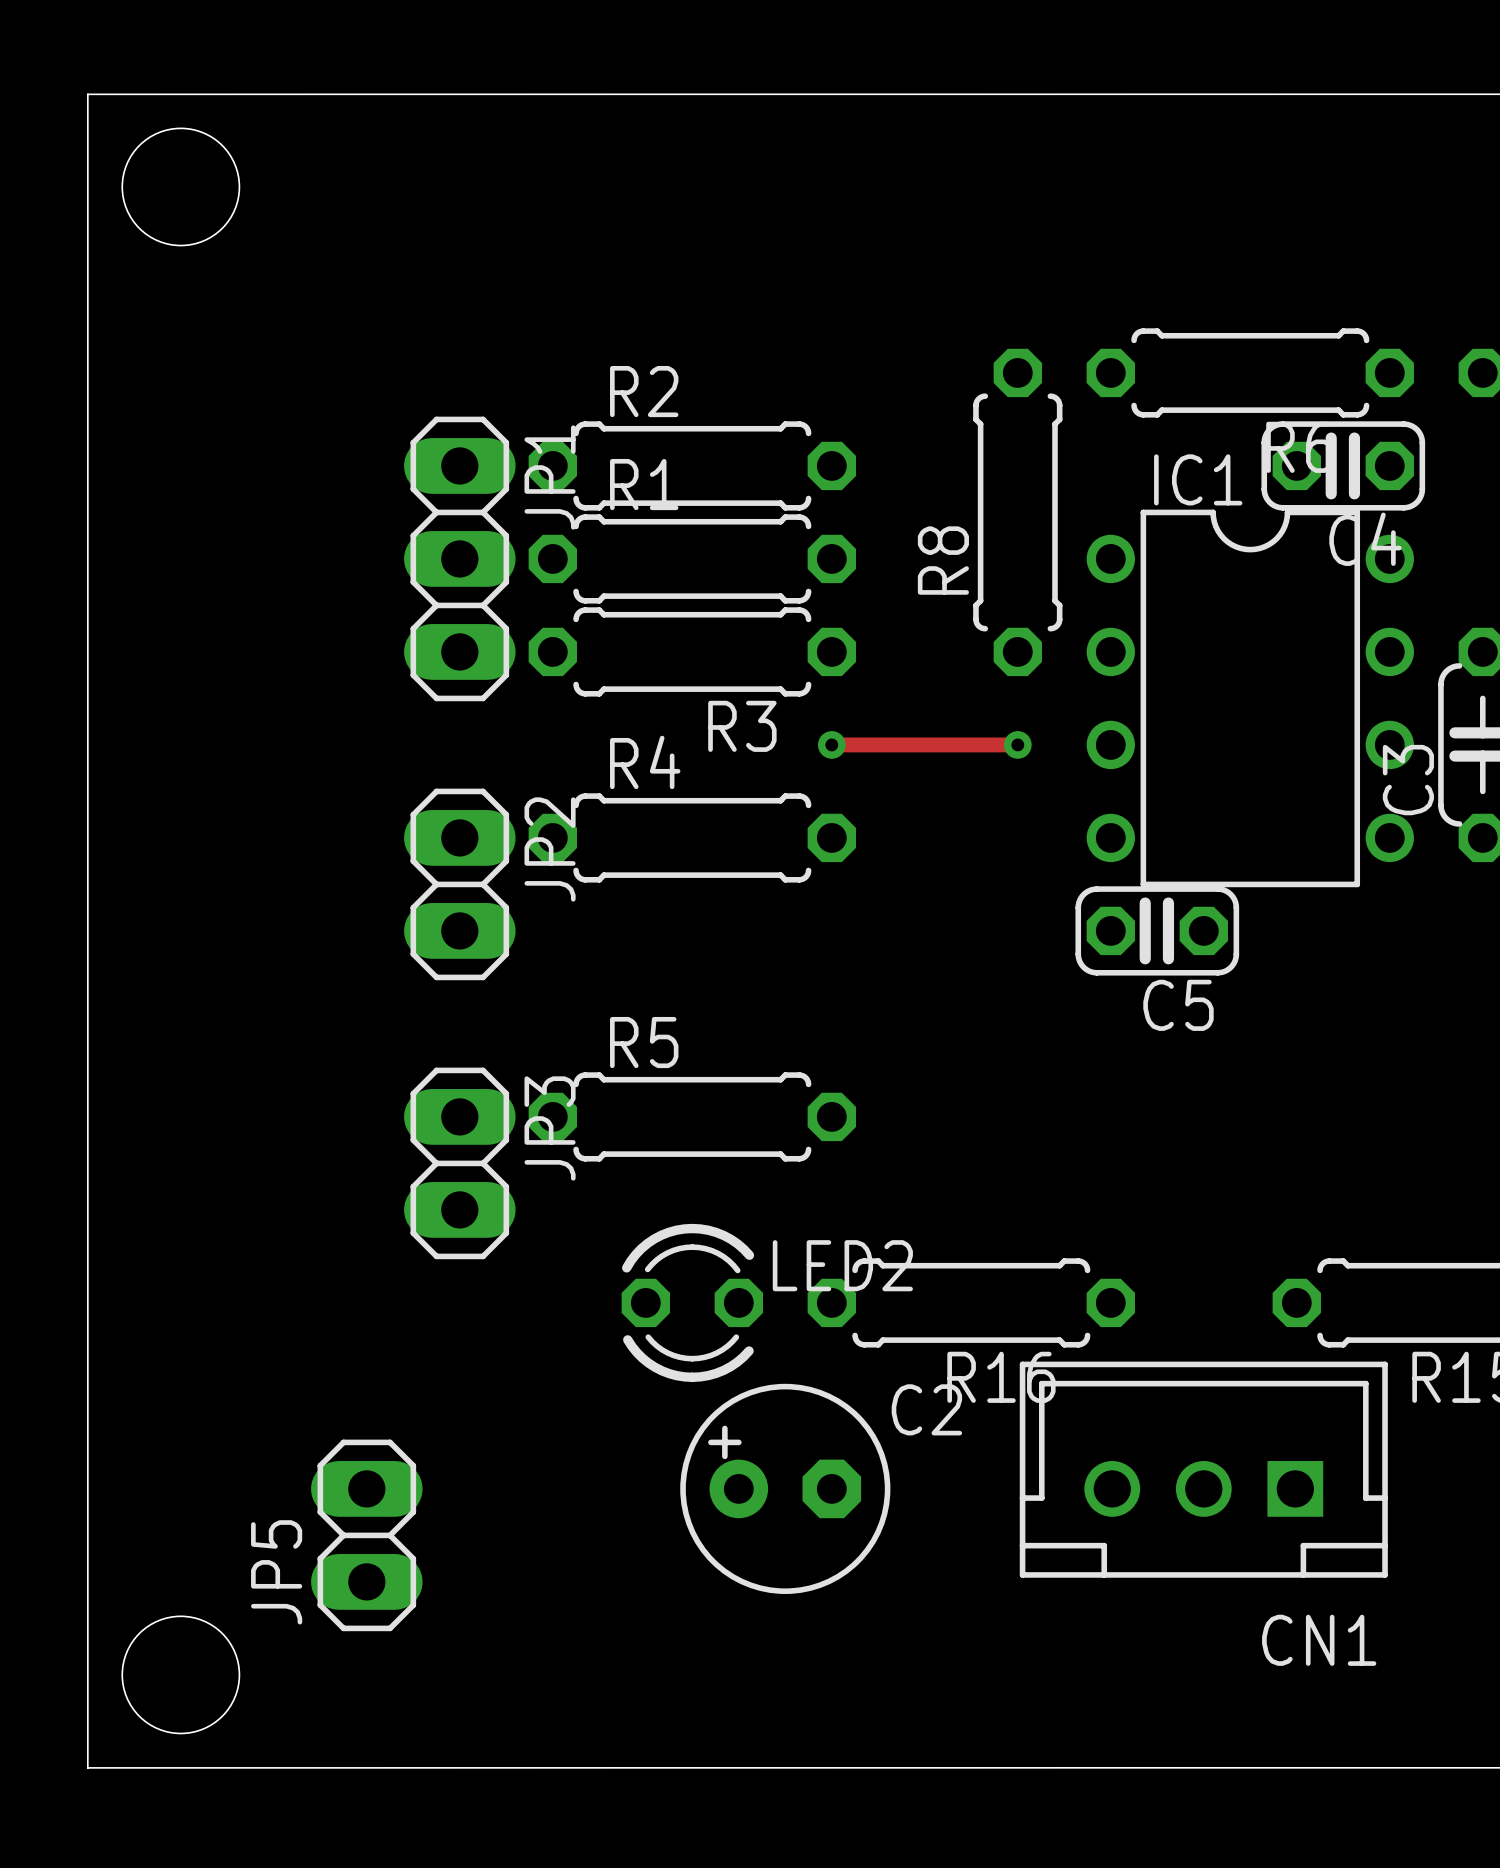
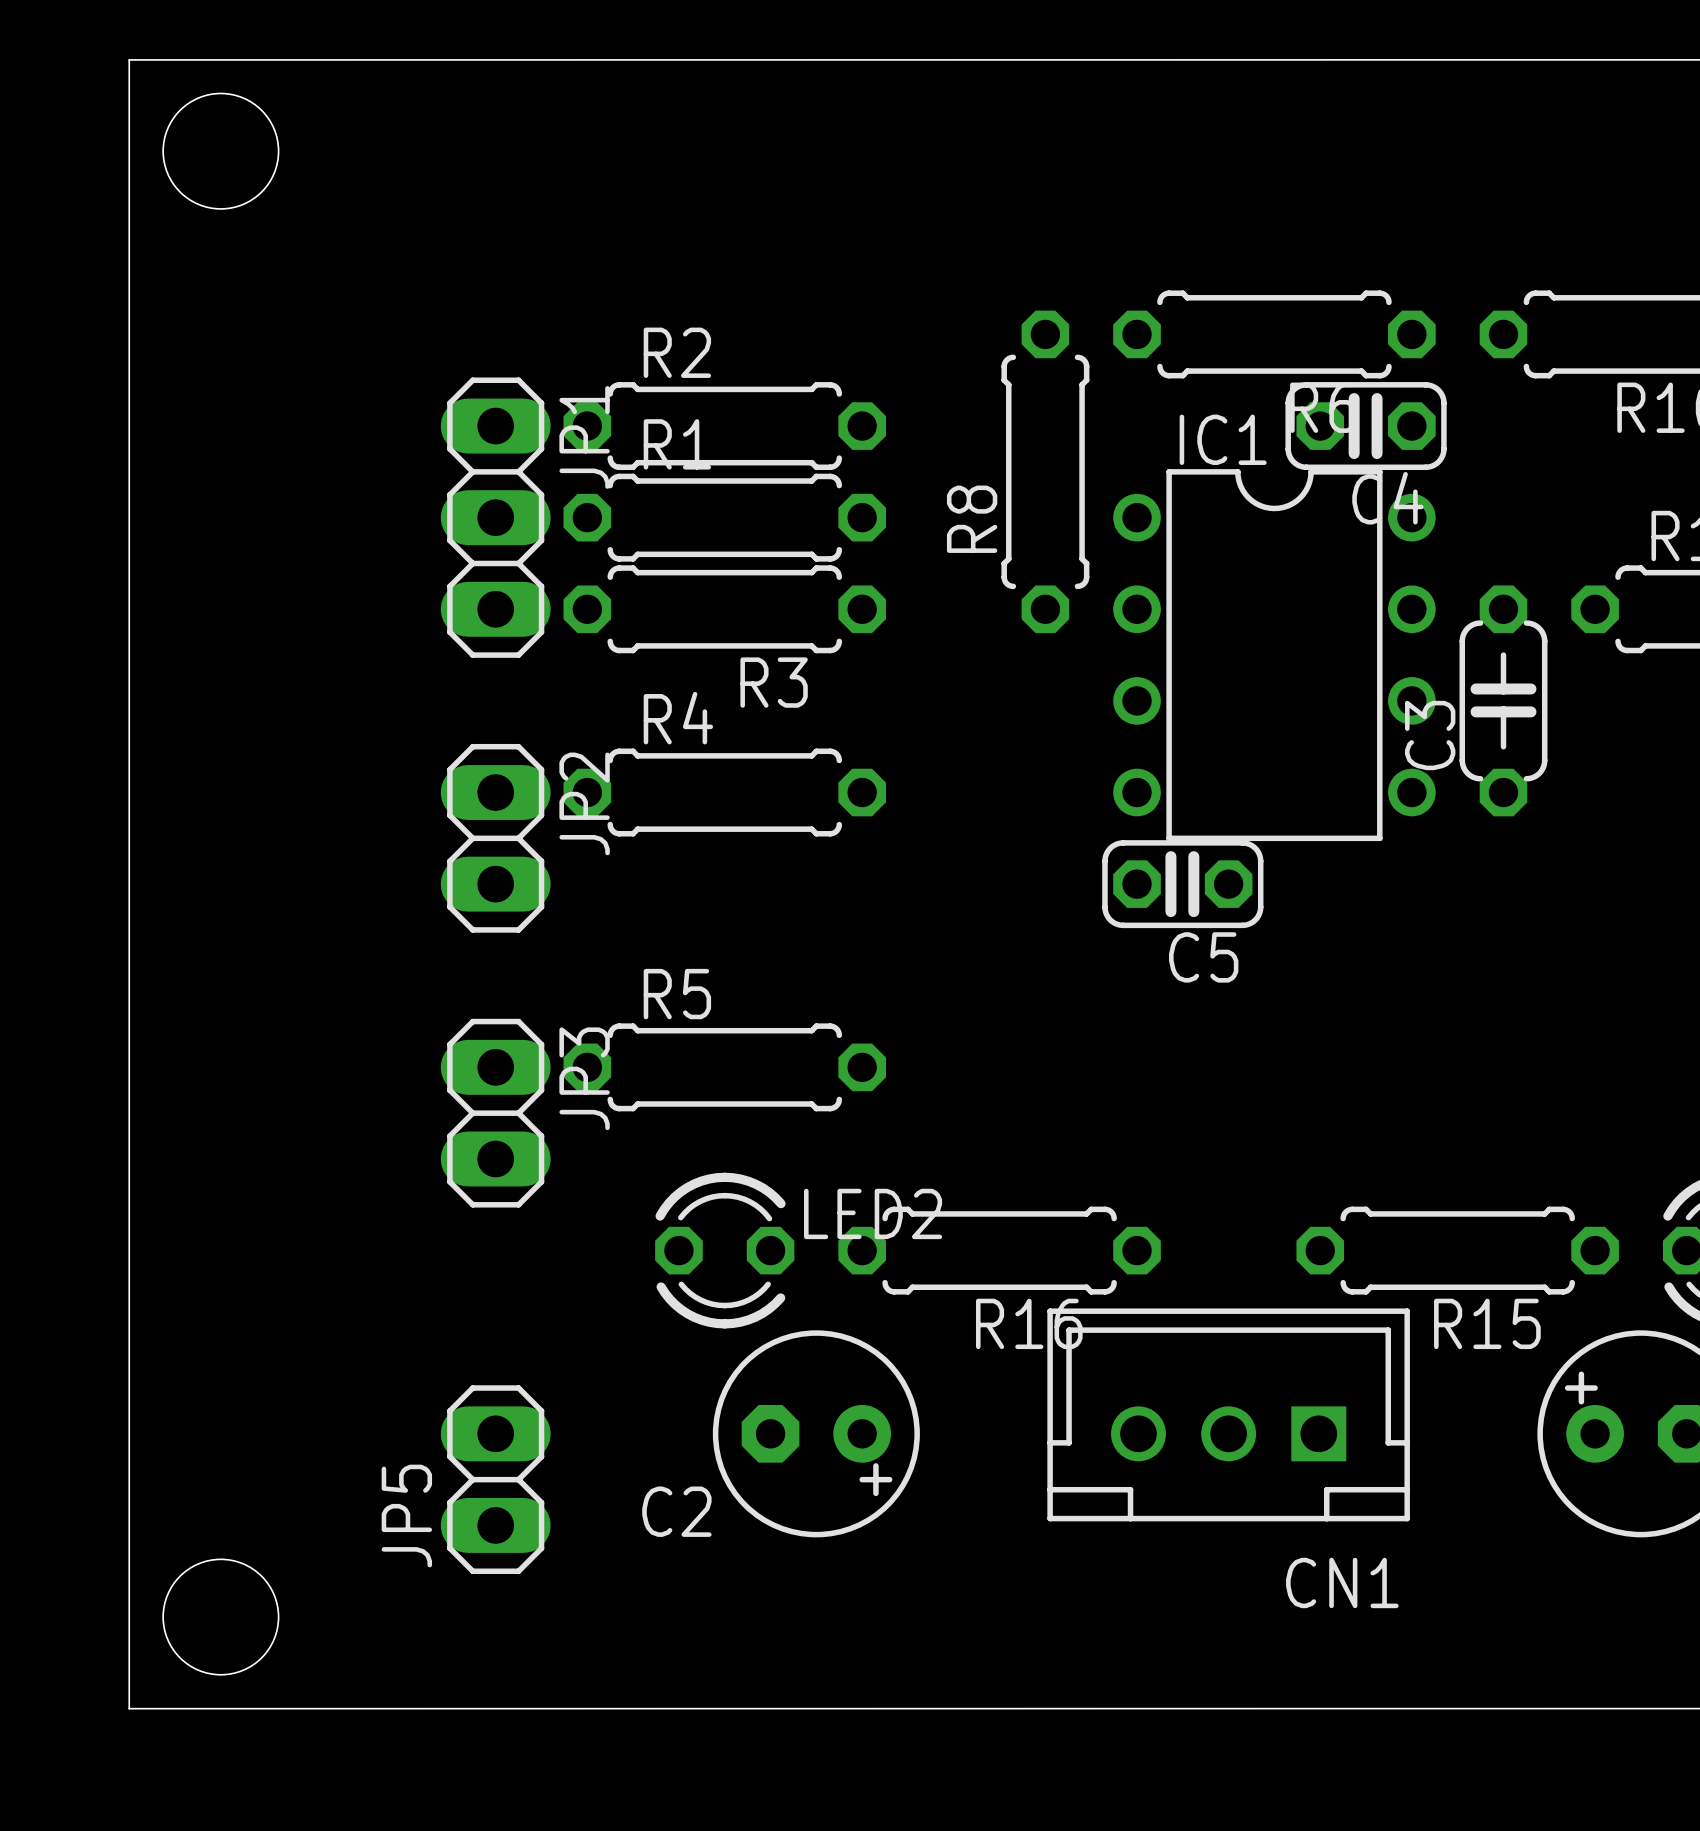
track: (831, 744) (1017, 744) -> none
via: (831, 744) -> none
via: (1017, 744) -> none
C2 rotation: 0° (785, 1488) -> 180° (816, 1433)
JP5 position: (366, 1535) -> (495, 1479)

